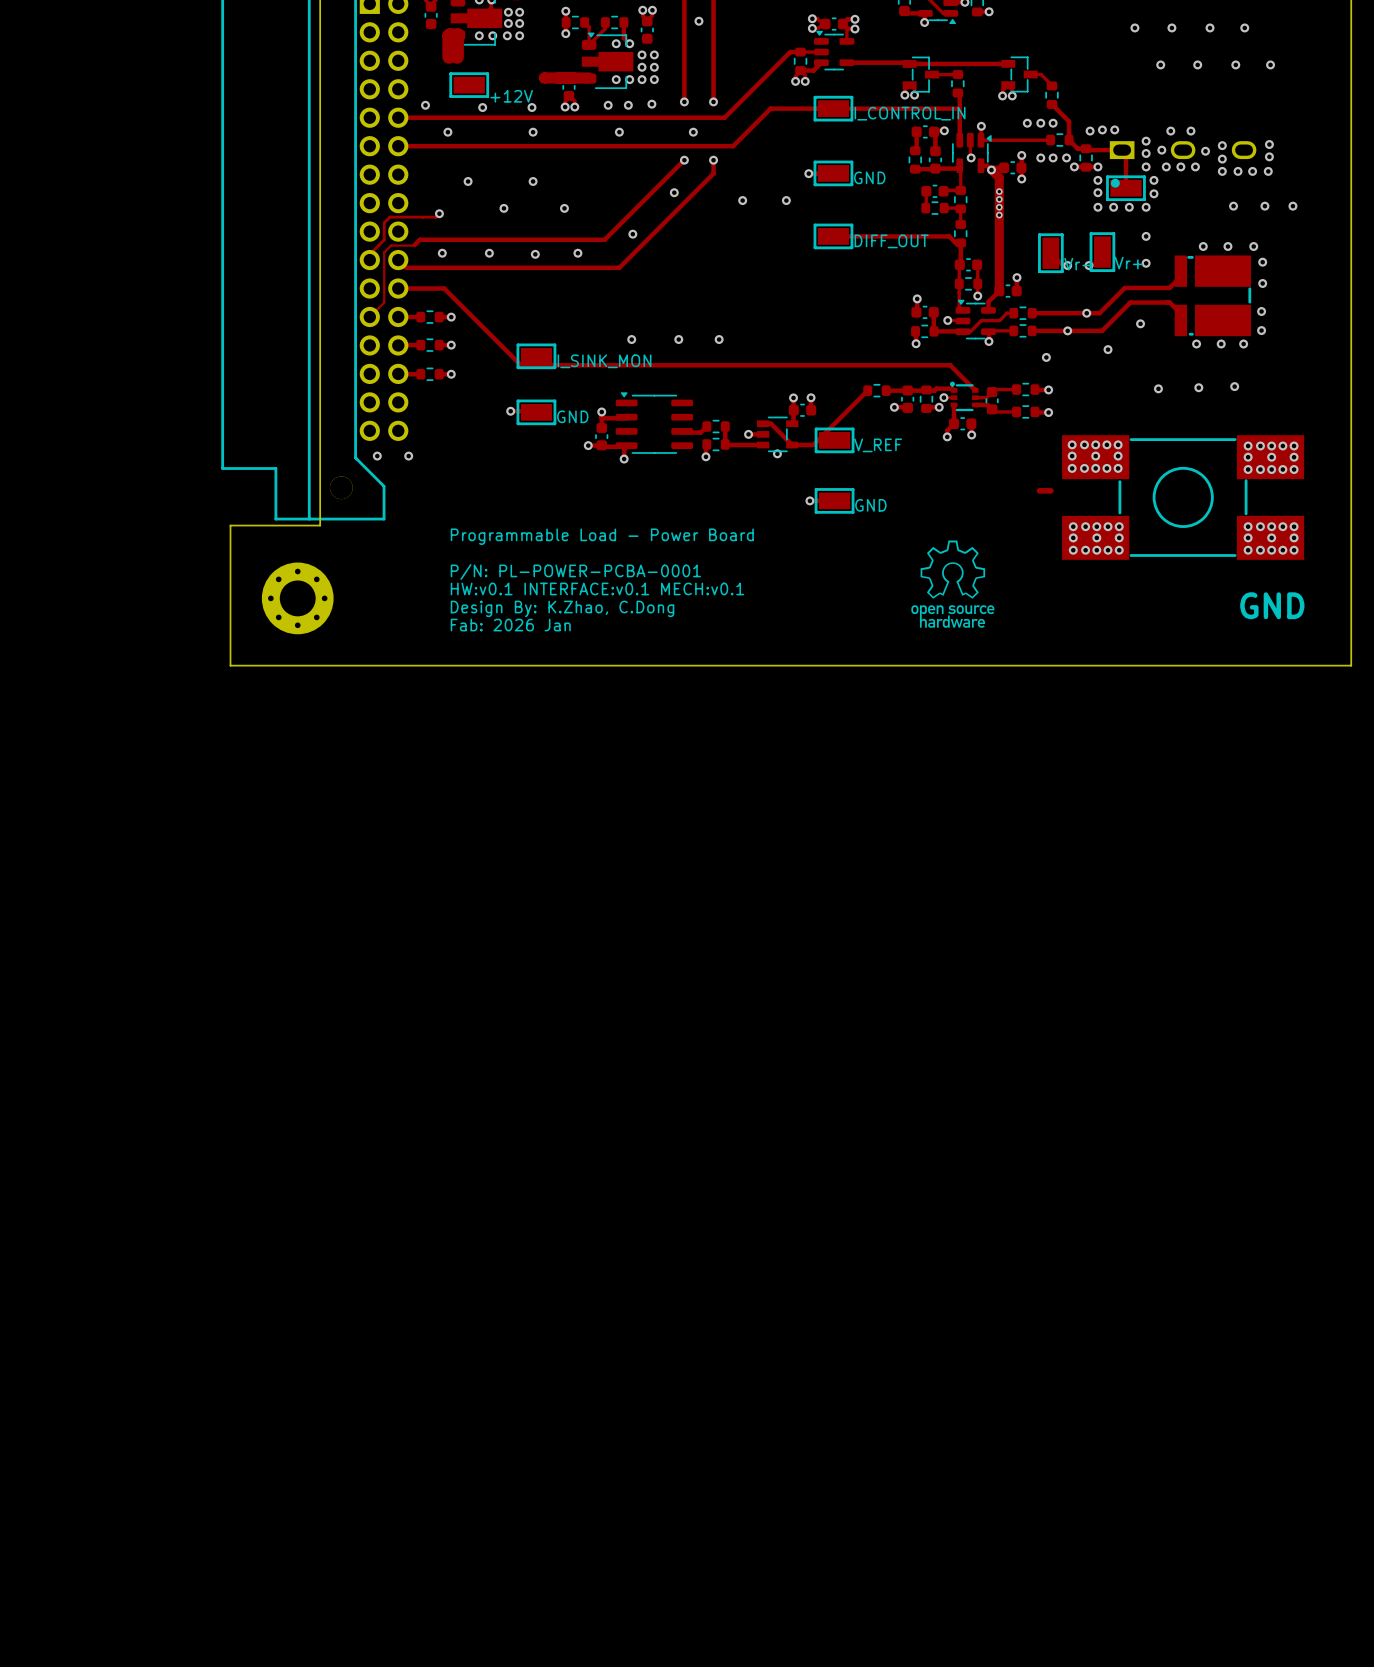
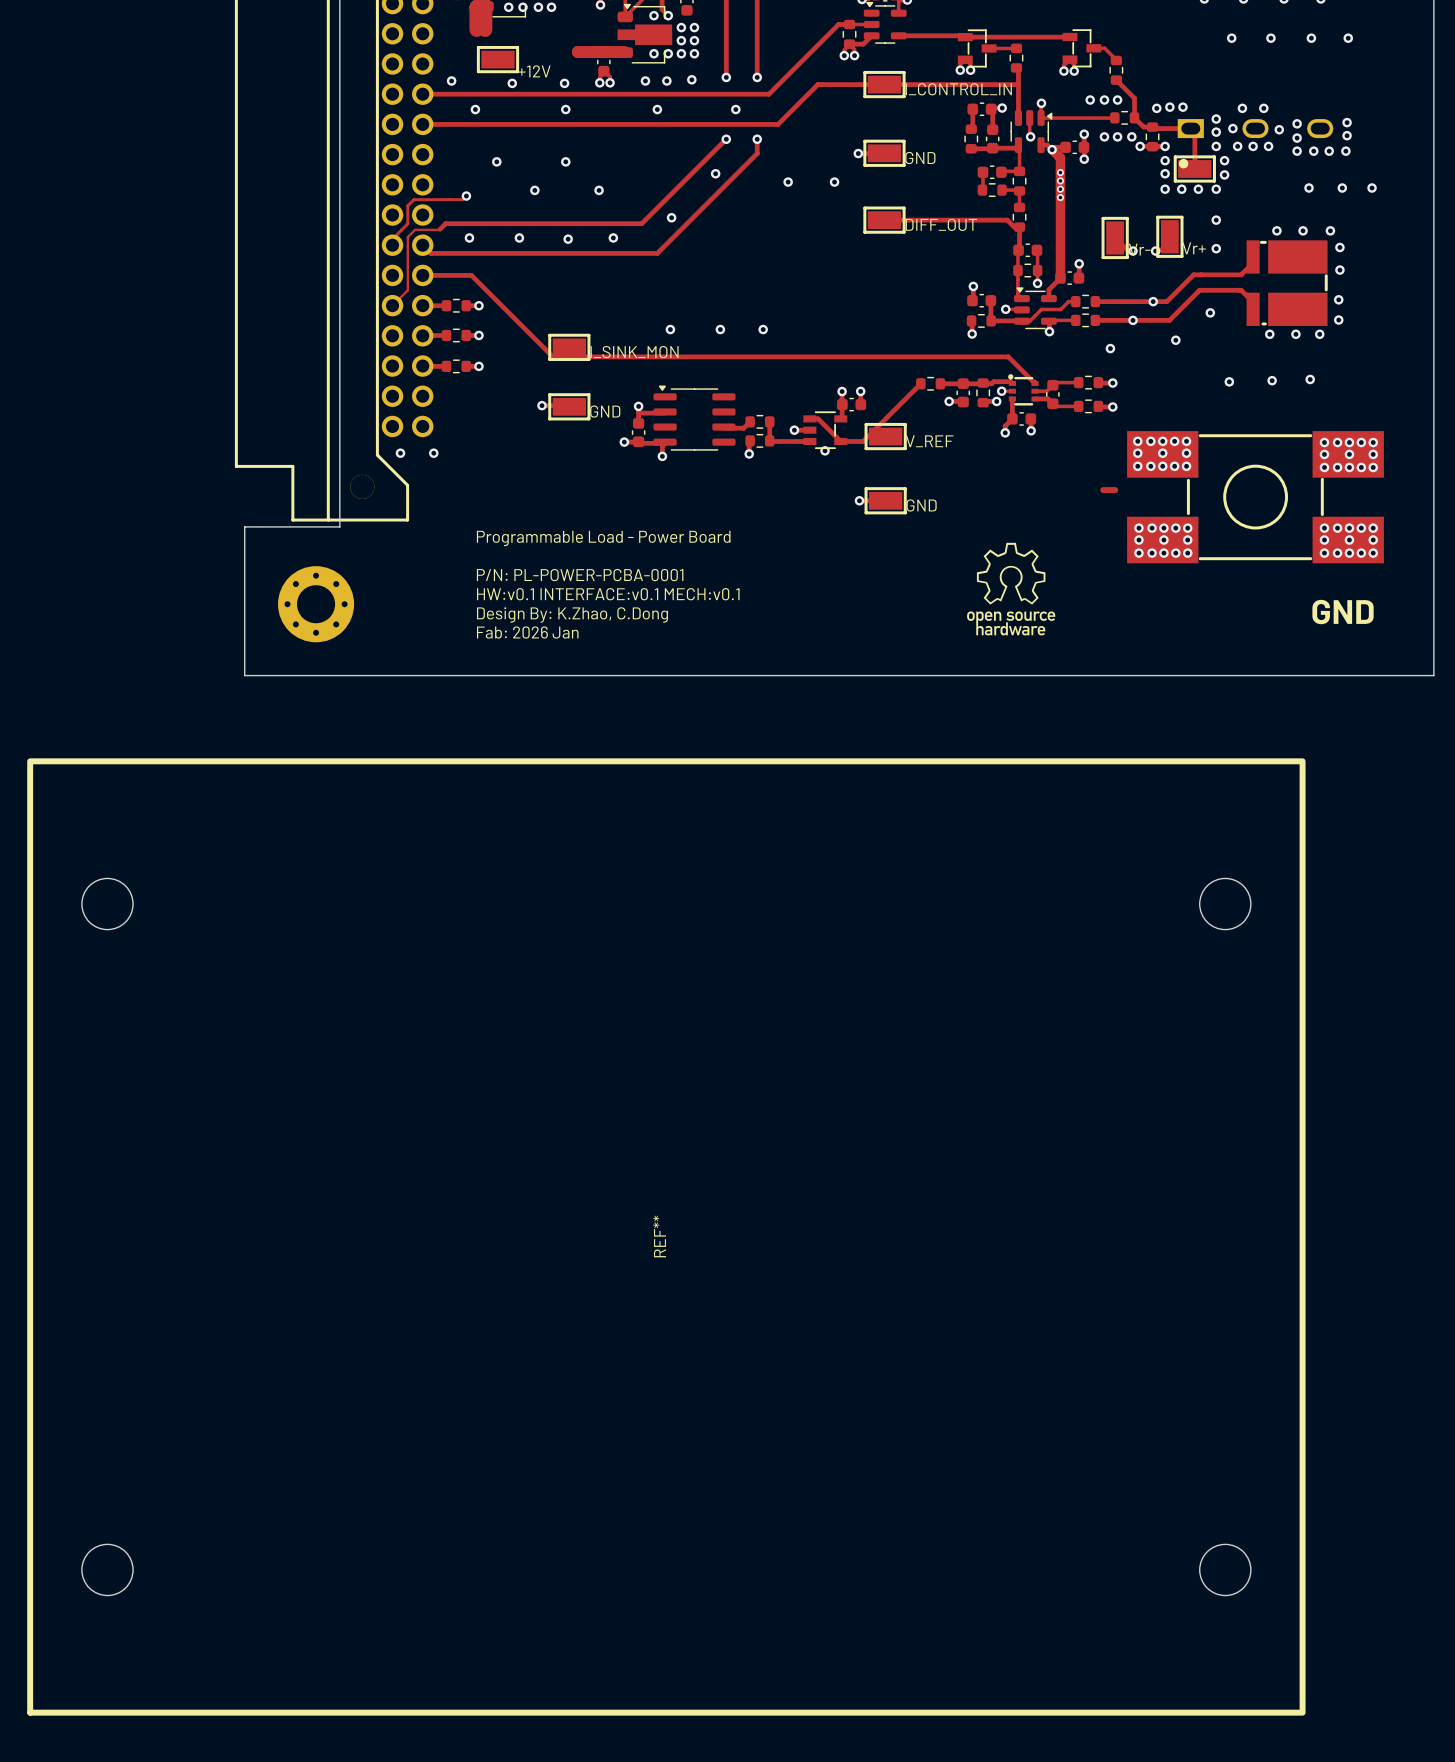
REF**: none -> (666, 1236)

